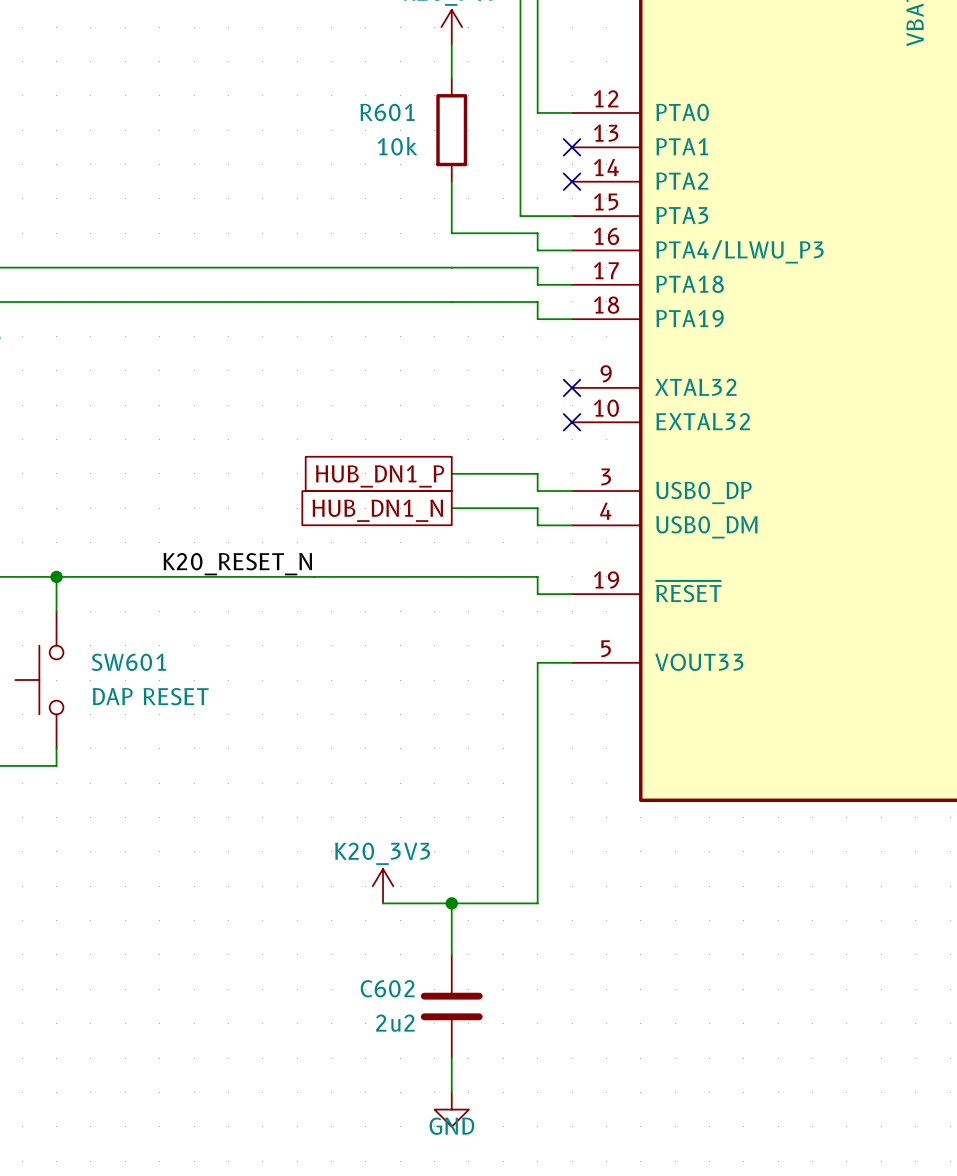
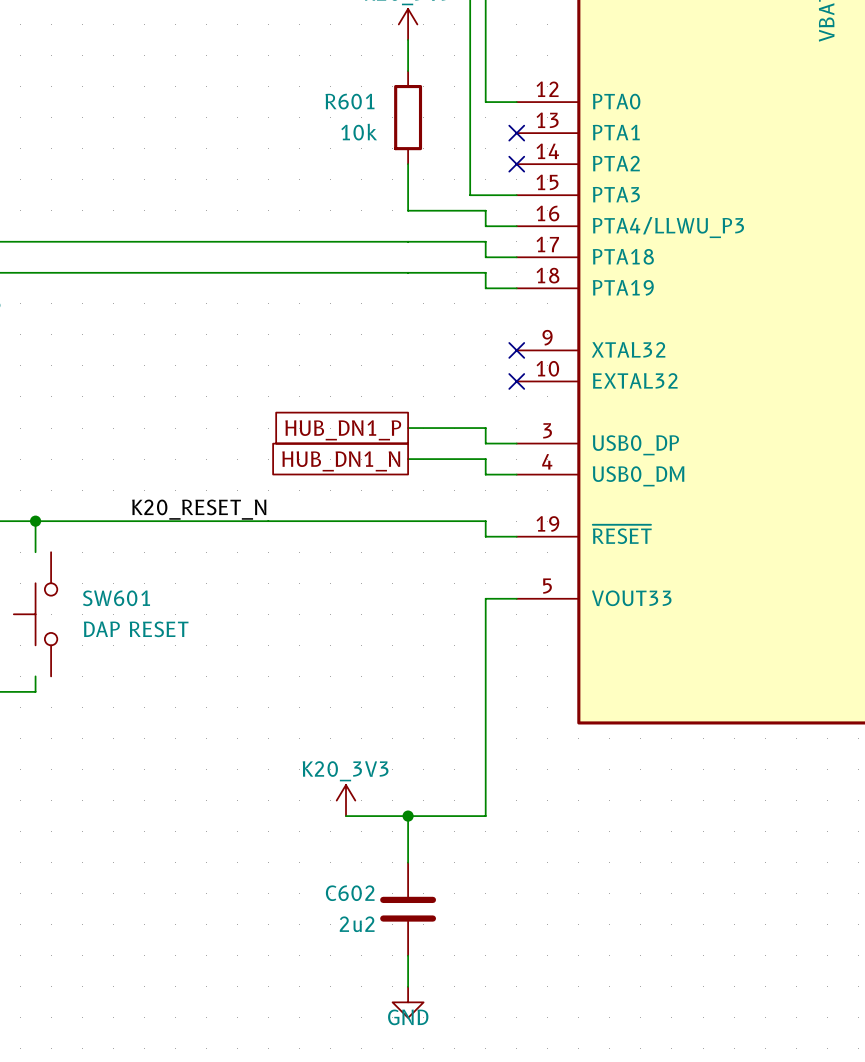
label position: K20_RESET_N (237, 564) -> K20_RESET_N (199, 509)
wire: (56, 576) (56, 611) -> (35, 521) (35, 552)
junction position: (56, 576) -> (35, 521)
wire: (56, 748) (56, 765) (39, 765) -> (35, 676) (35, 691)

